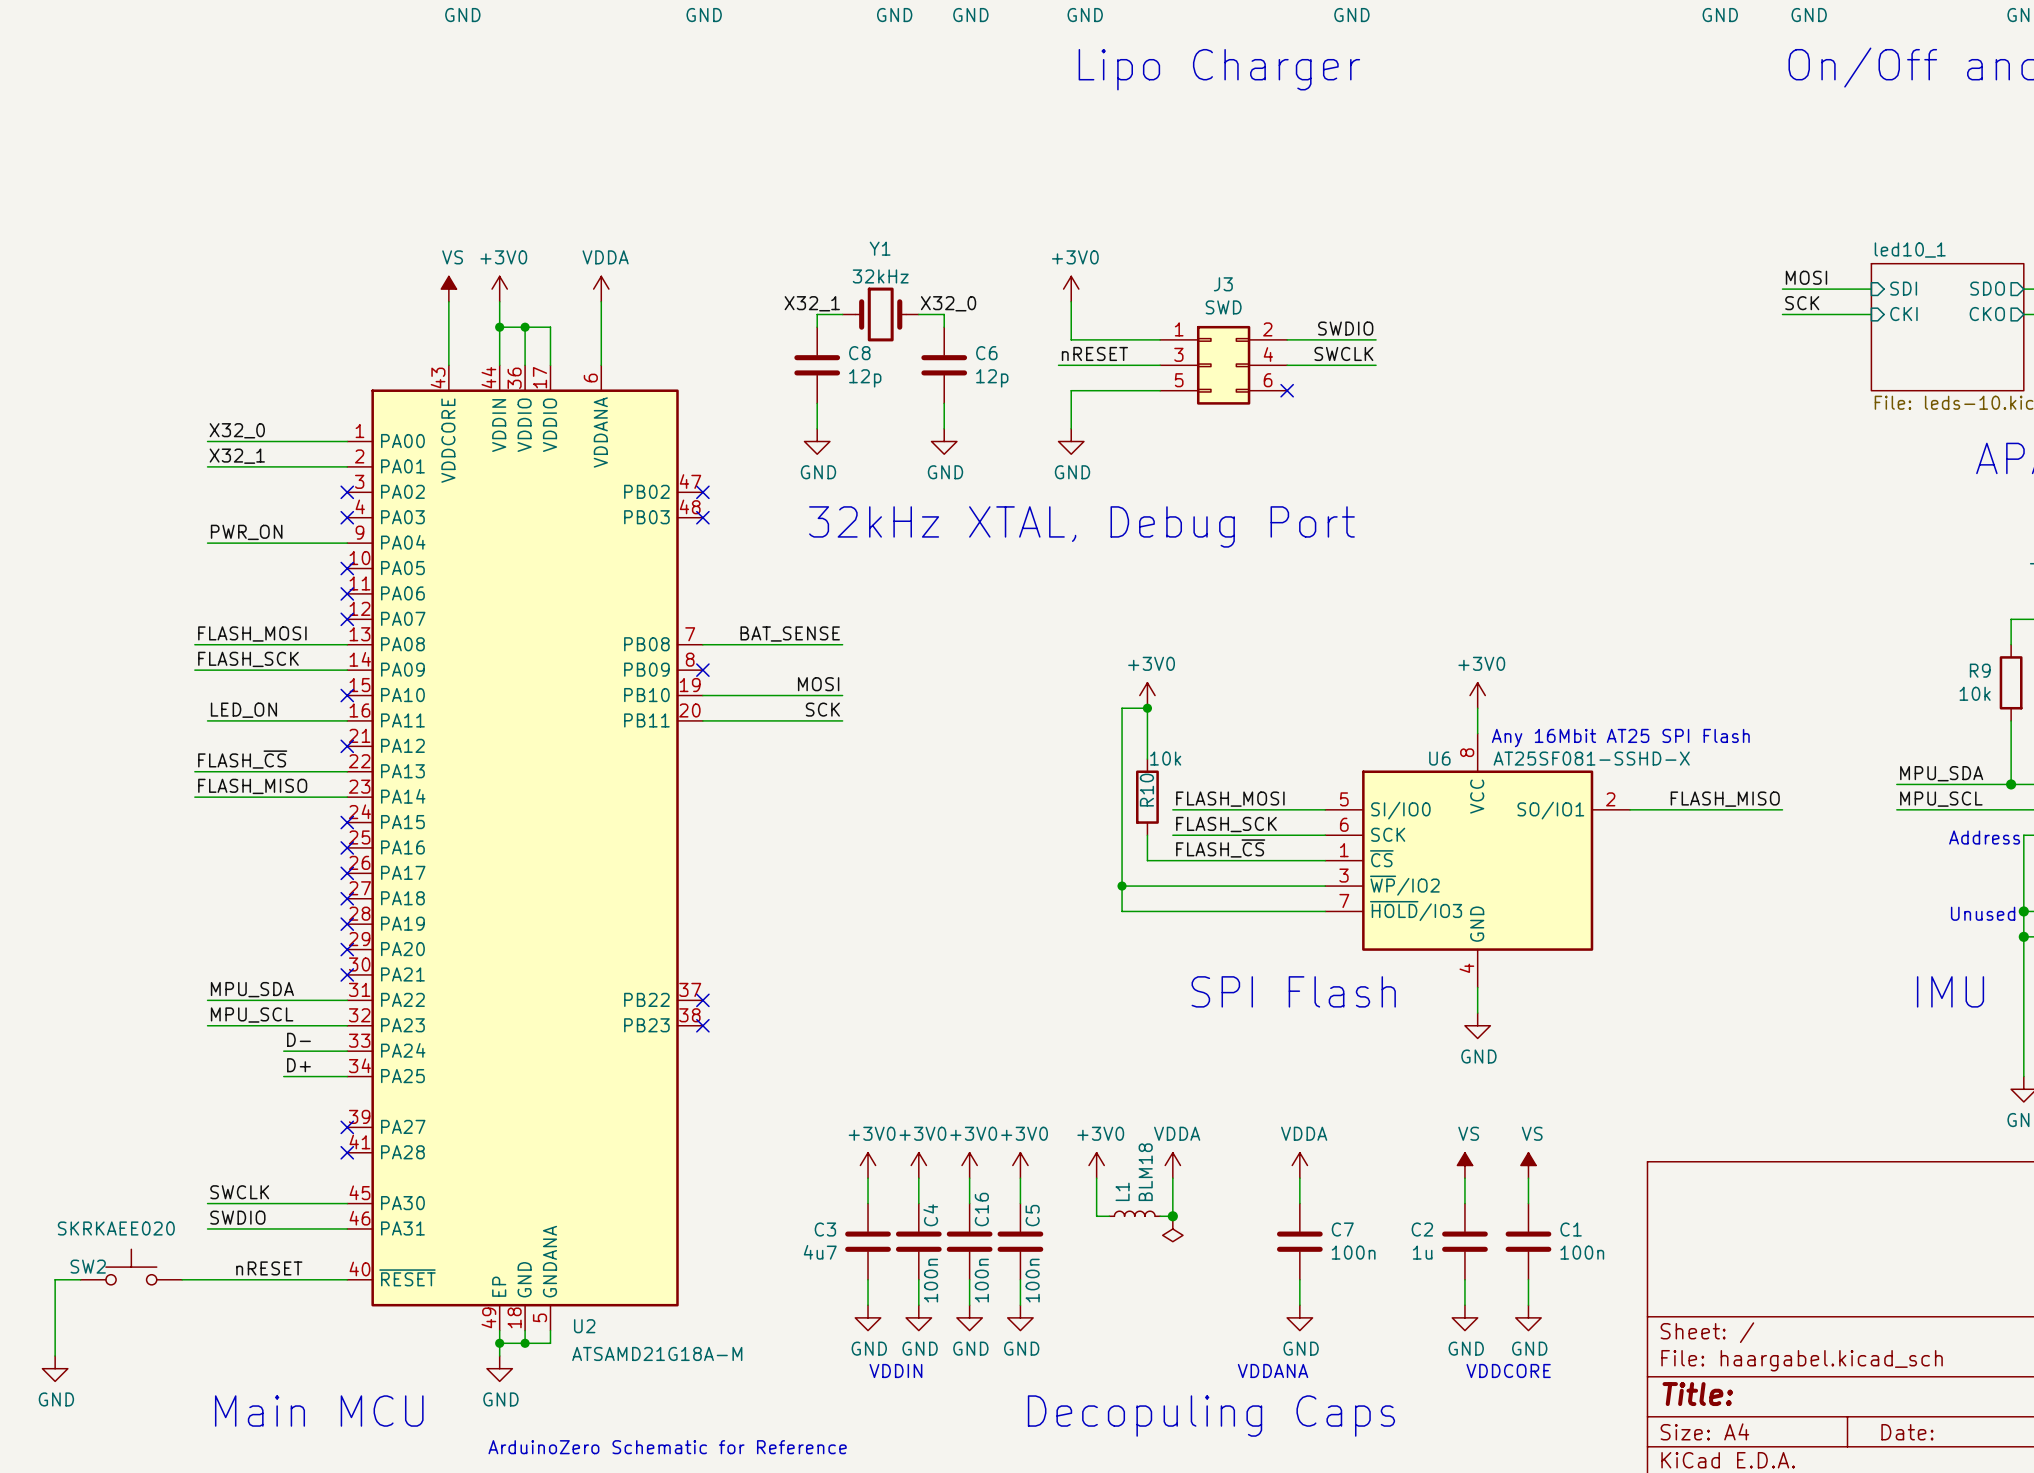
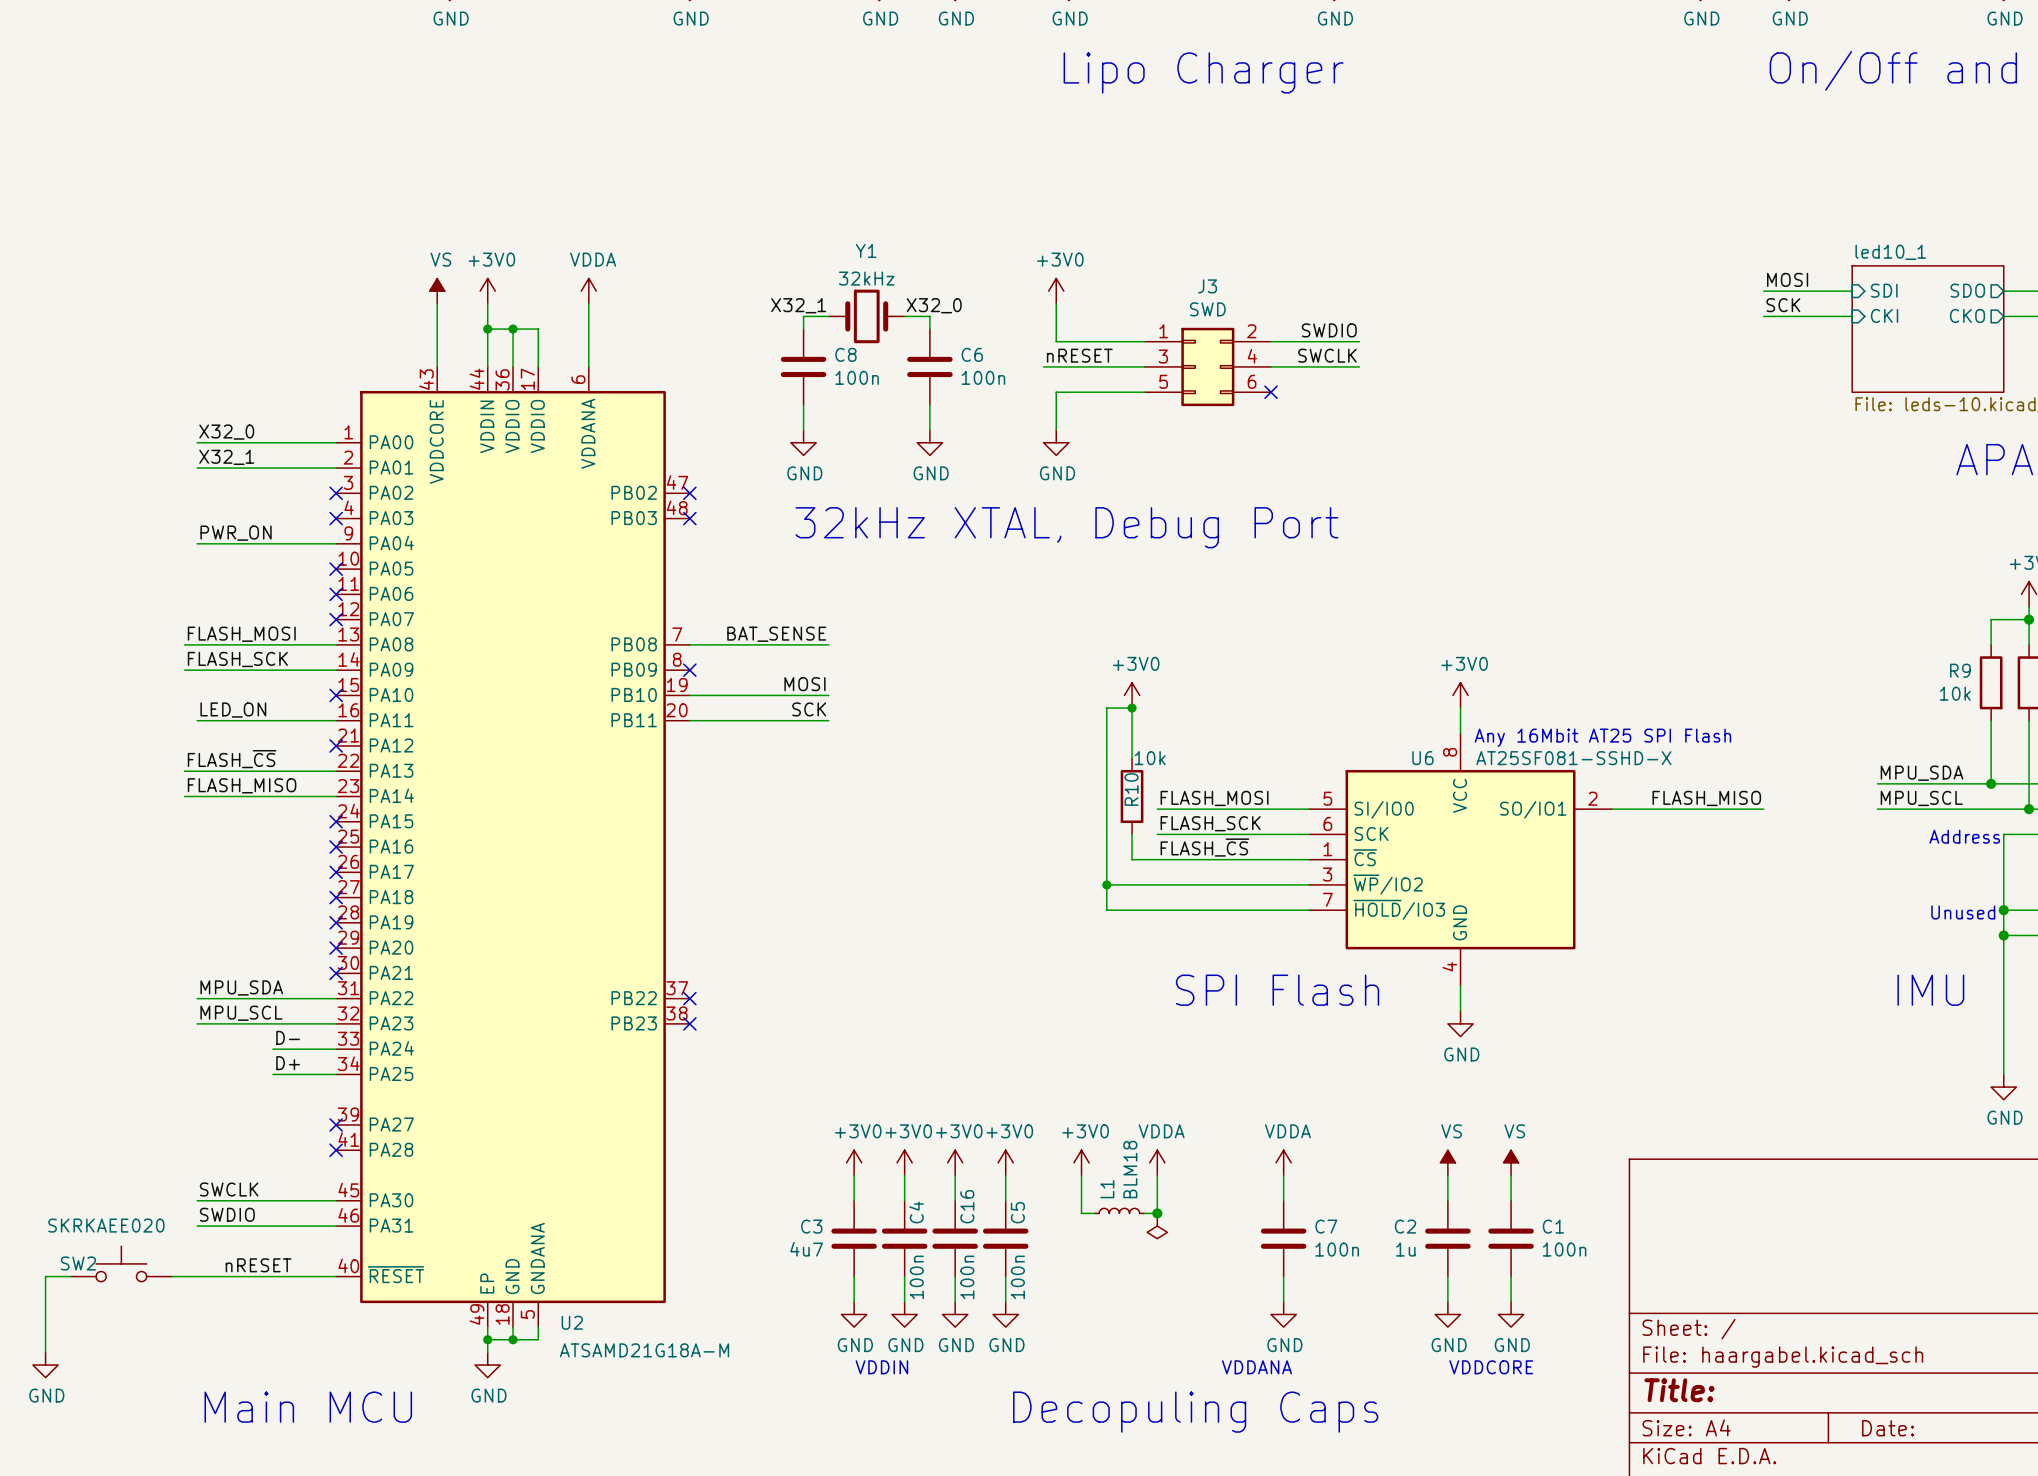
C8 value: 12p (865, 378) -> 100n (857, 377)
C6 value: 12p (992, 378) -> 100n (983, 377)
text: ArduinoZero Schematic for Reference (667, 1447) -> none

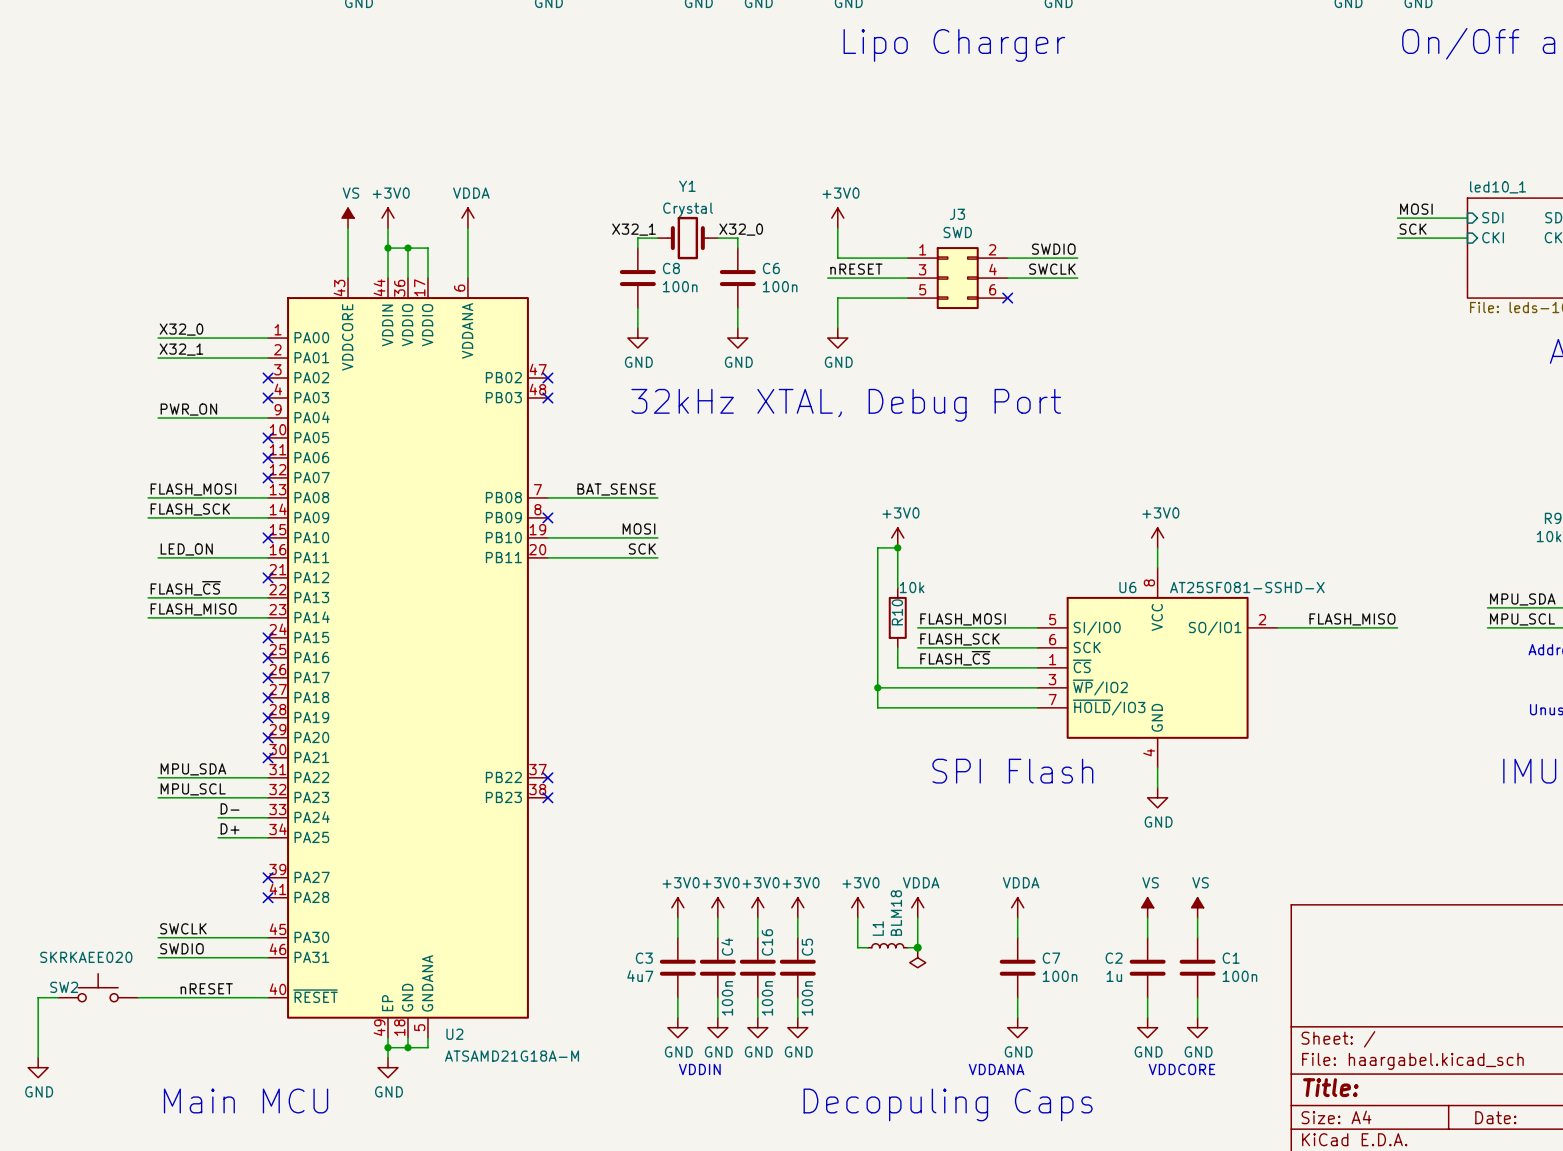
Y1 value: 32kHz (866, 278) -> Crystal (688, 209)
text: Any 16Mbit AT25 SPI Flash (1602, 737) -> none

